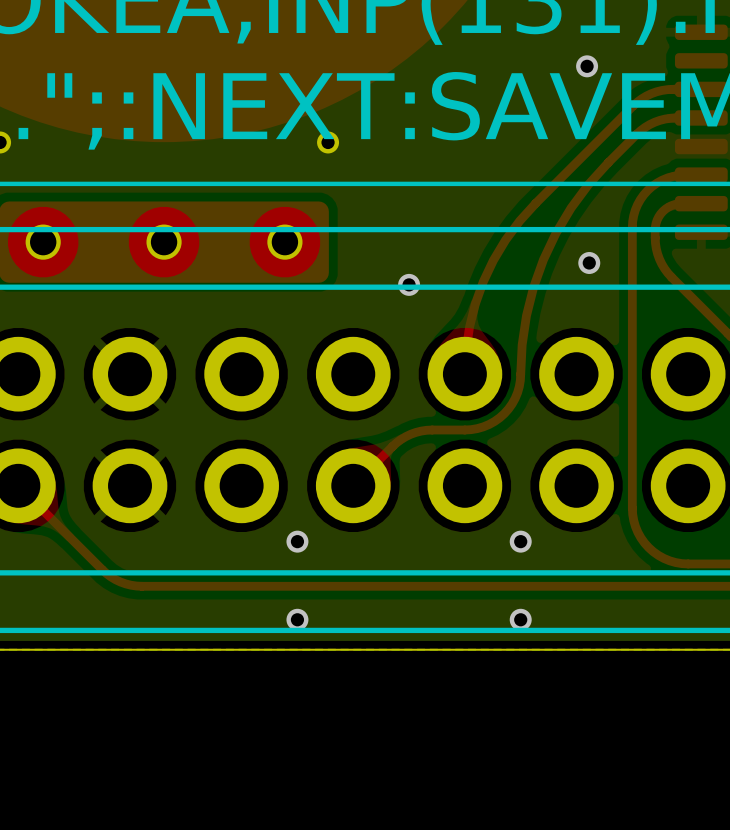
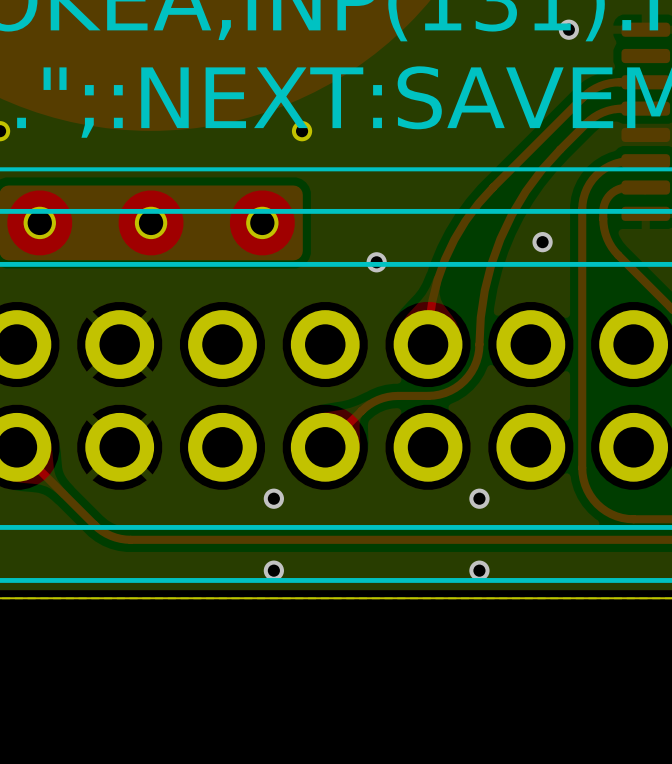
via: none -> (568, 29)
via: (587, 66) -> none

